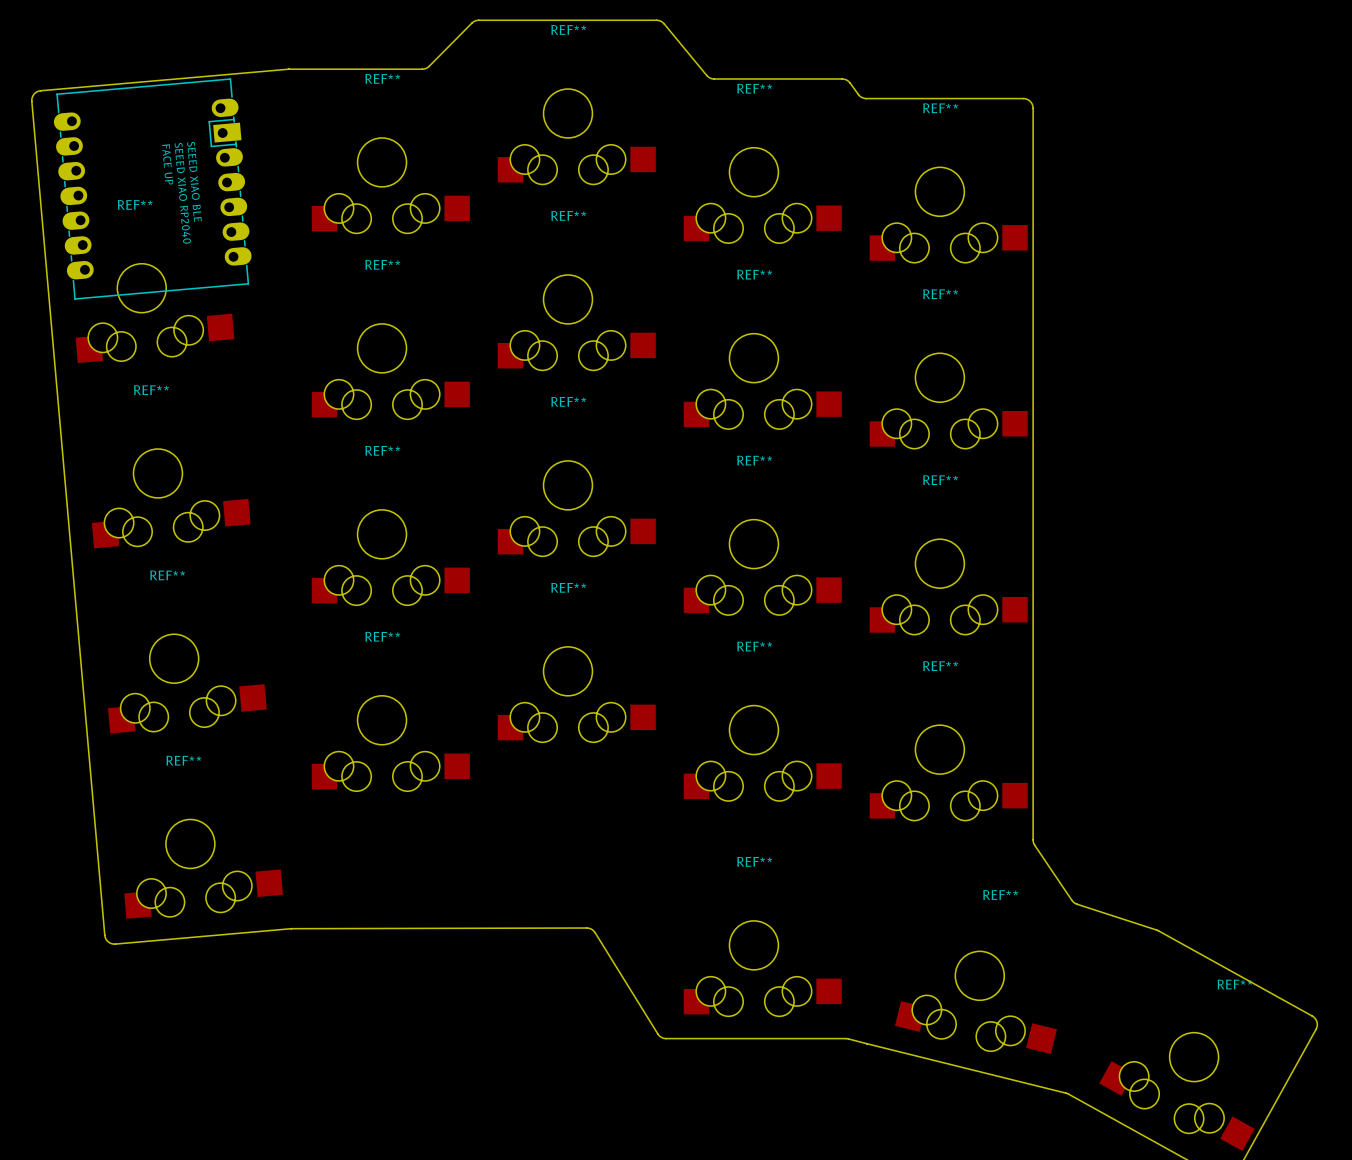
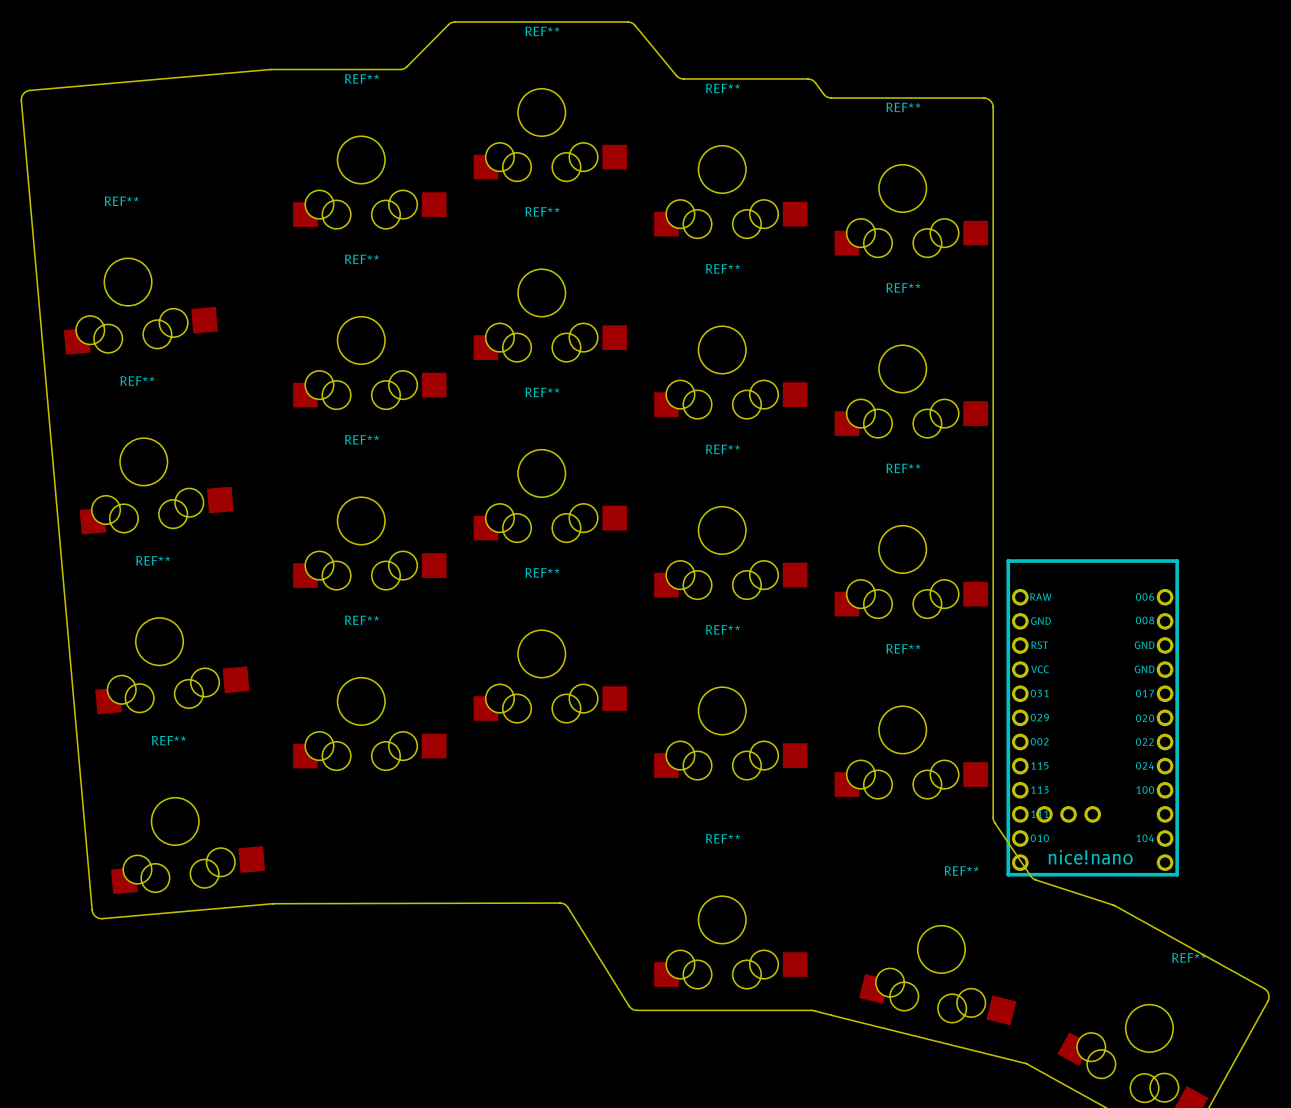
part: (152, 189) -> none
part: none -> (1092, 717)

